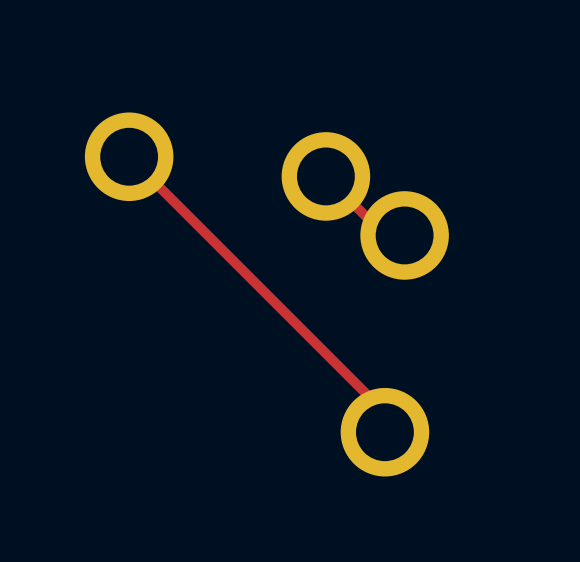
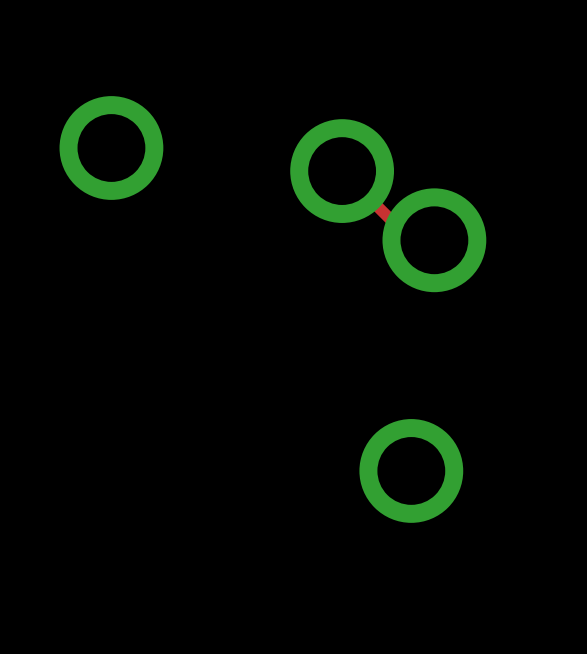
top track: (129, 156) (384, 412) -> none

